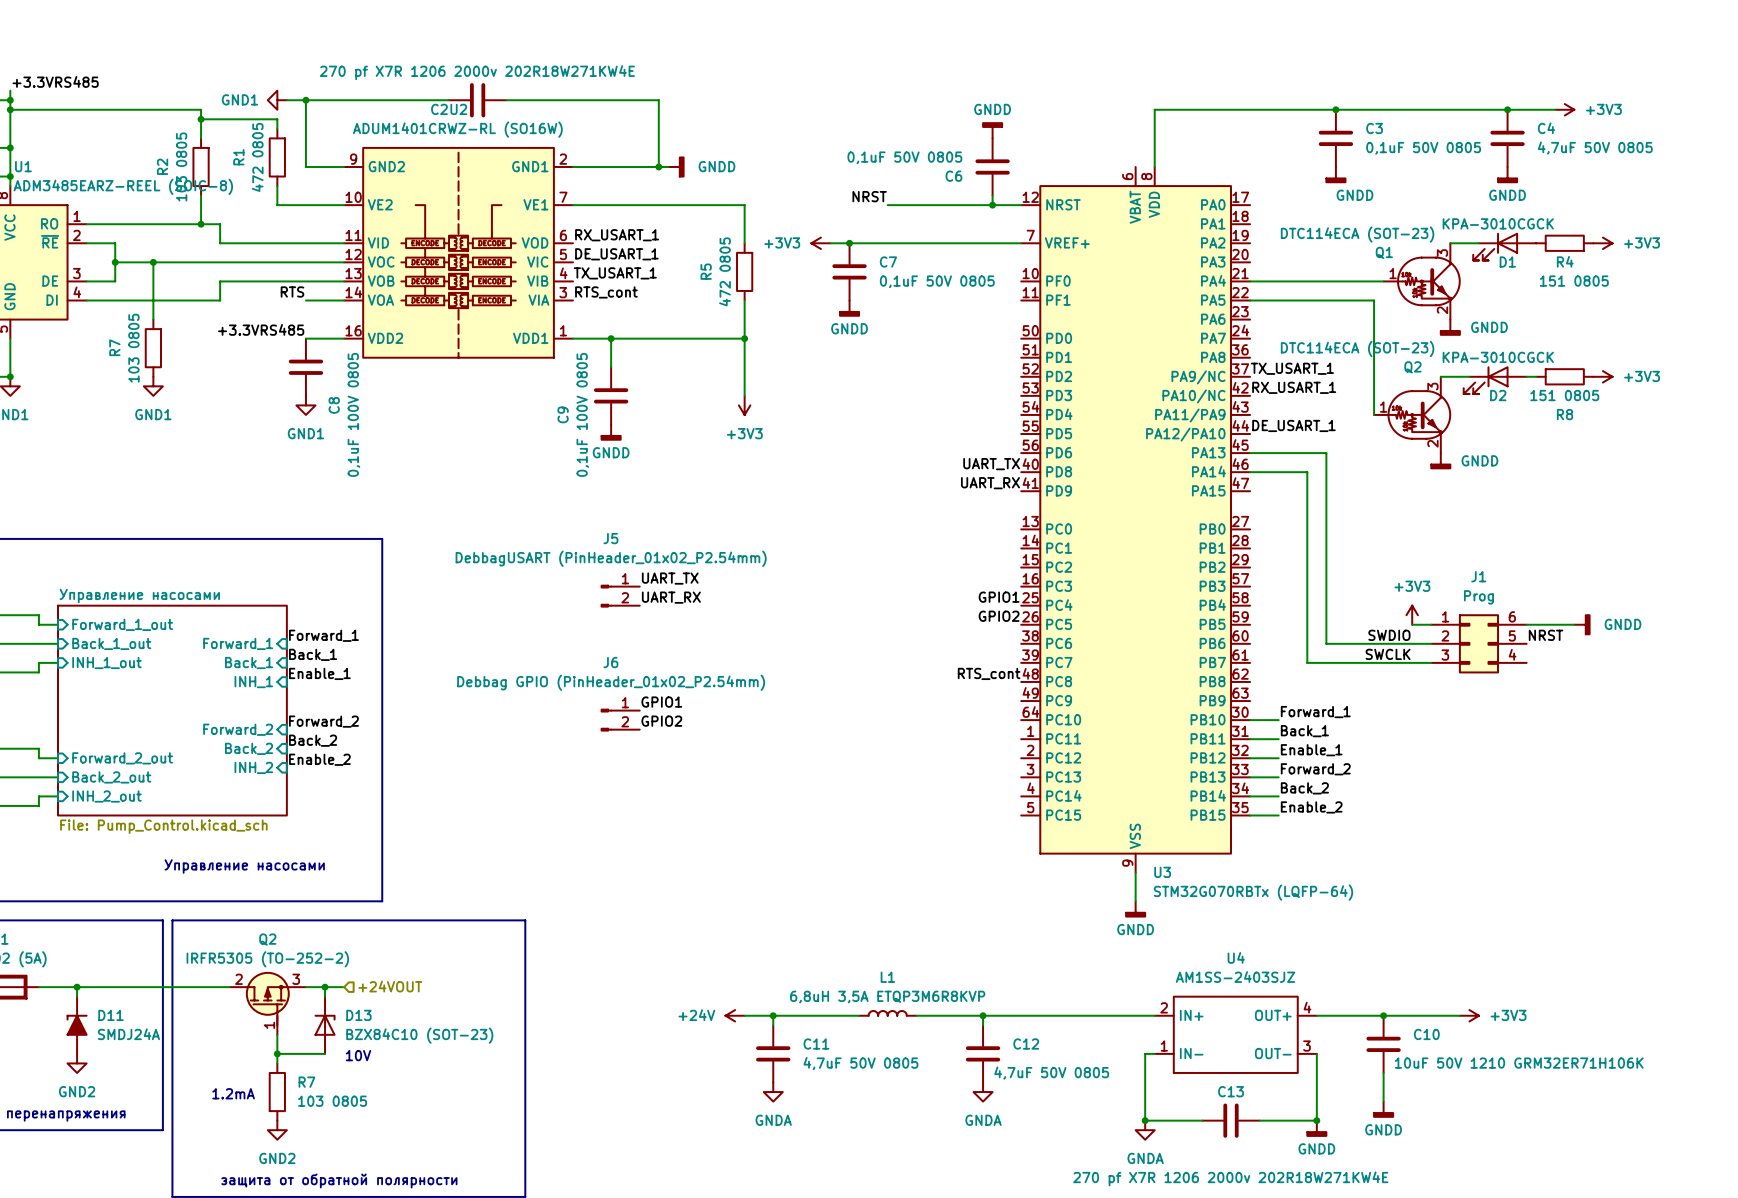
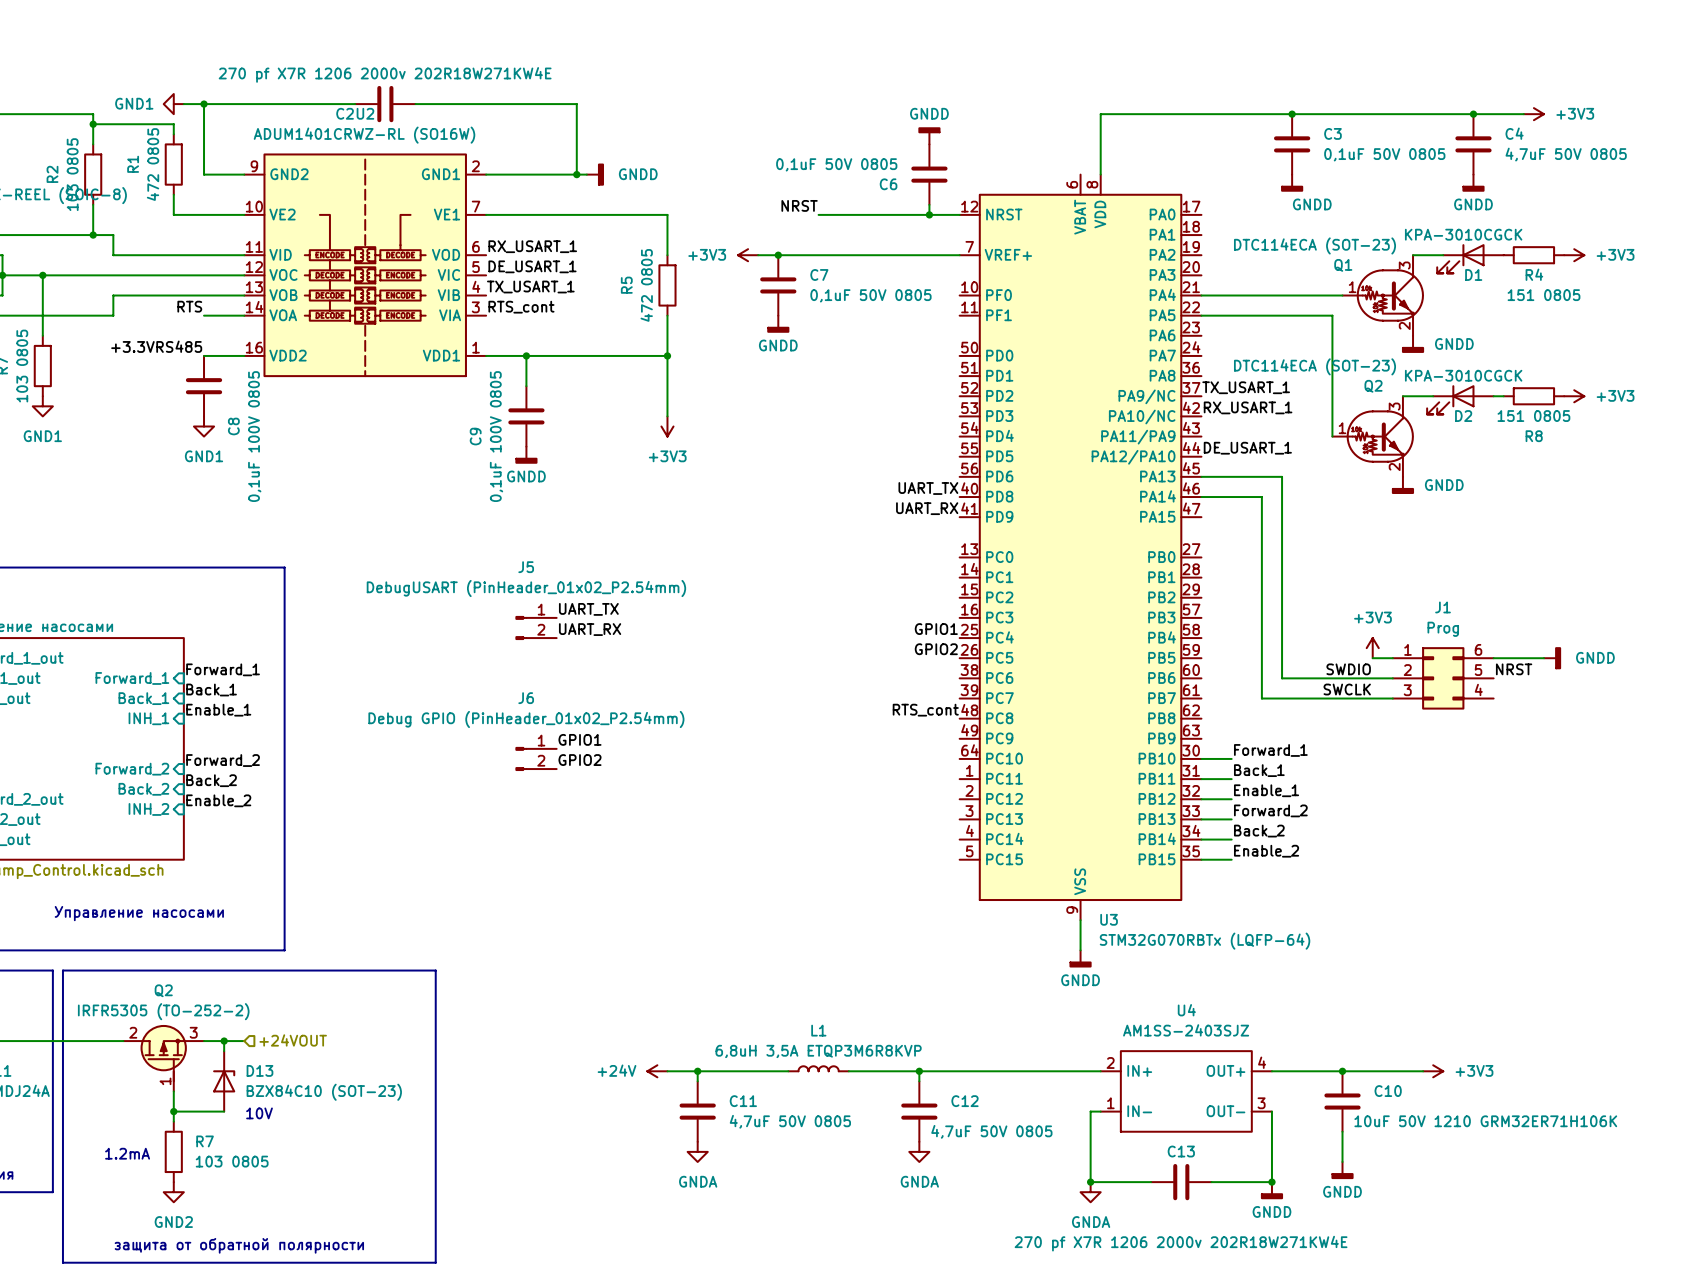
J5 value: DebbagUSART (PinHeader_01x02_P2.54mm) (611, 558) -> DebugUSART (PinHeader_01x02_P2.54mm) (526, 588)
J6 value: Debbag GPIO (PinHeader_01x02_P2.54mm) (611, 682) -> Debug GPIO (PinHeader_01x02_P2.54mm) (526, 719)

